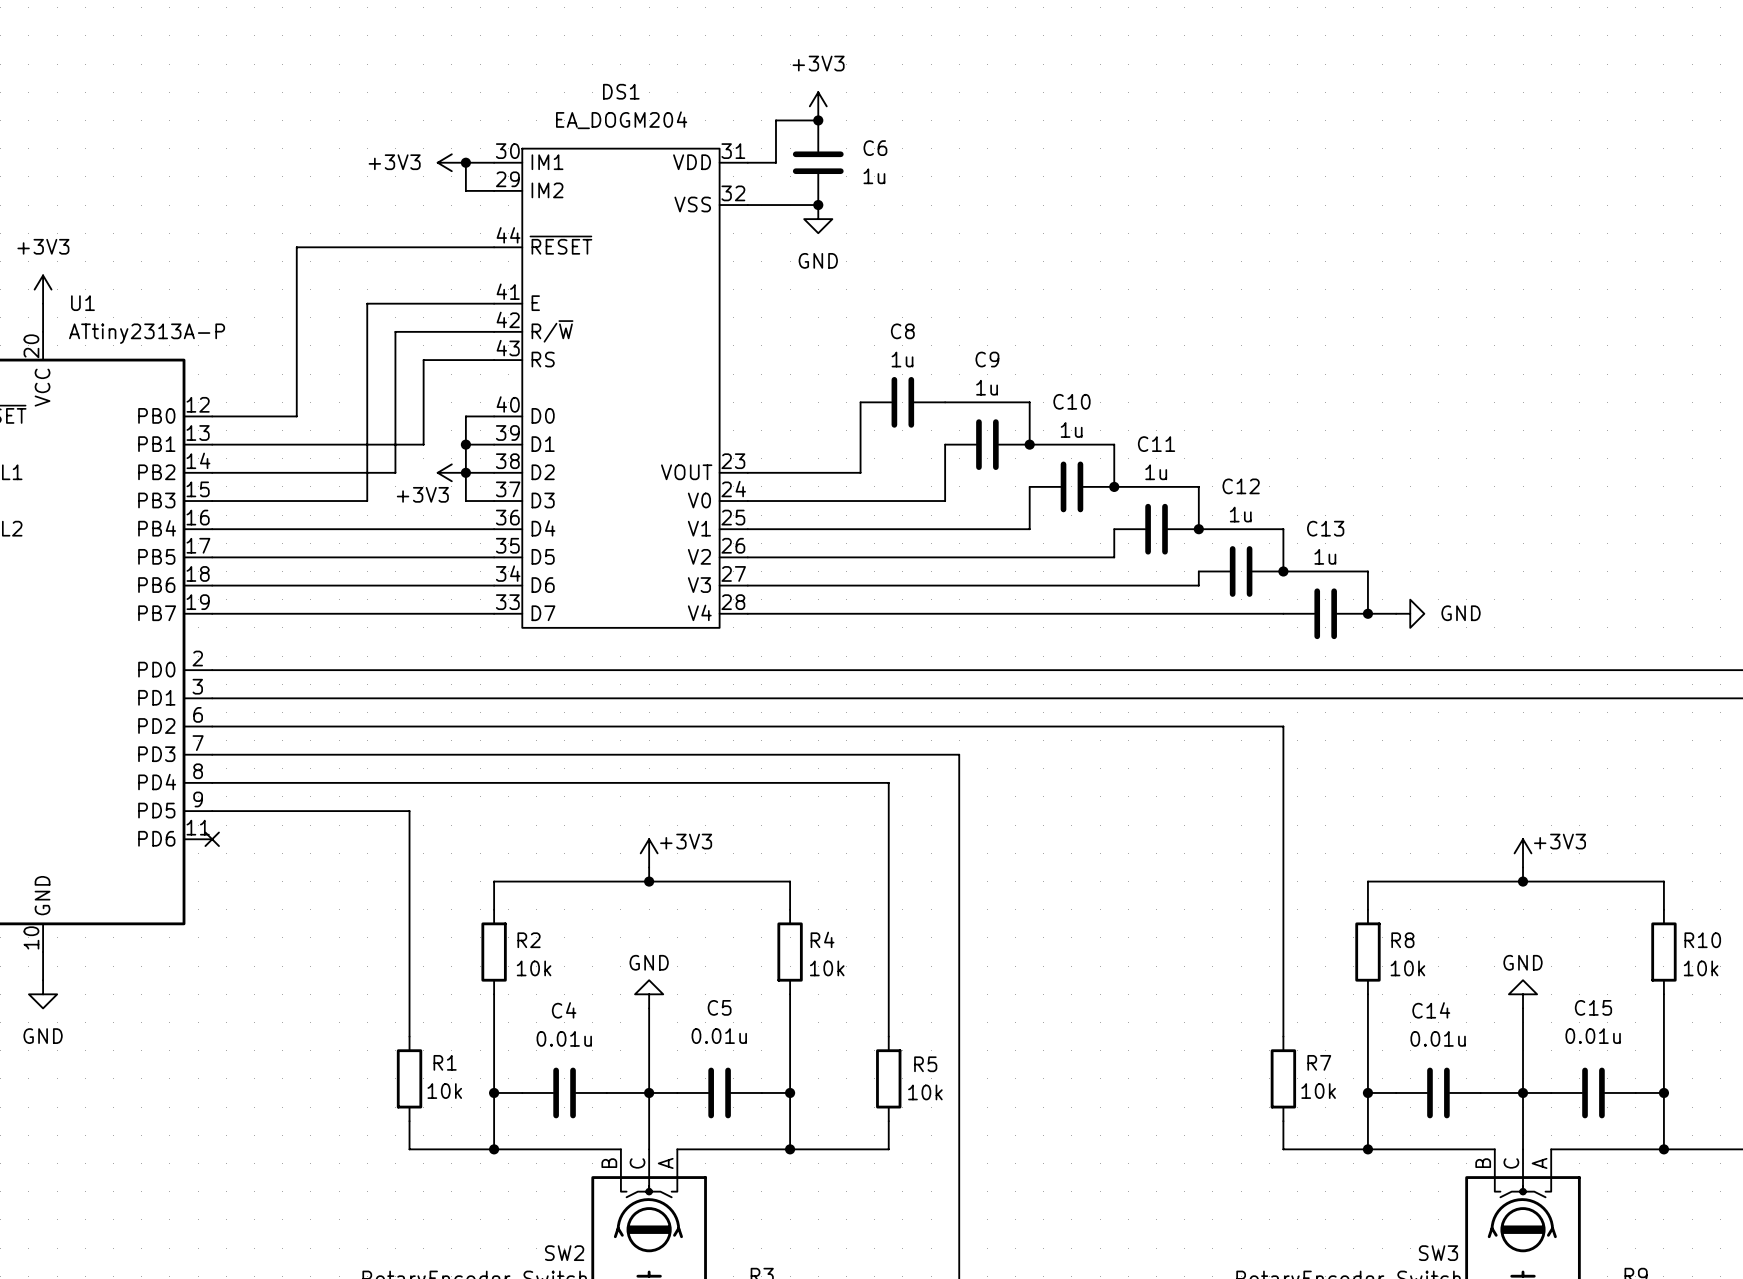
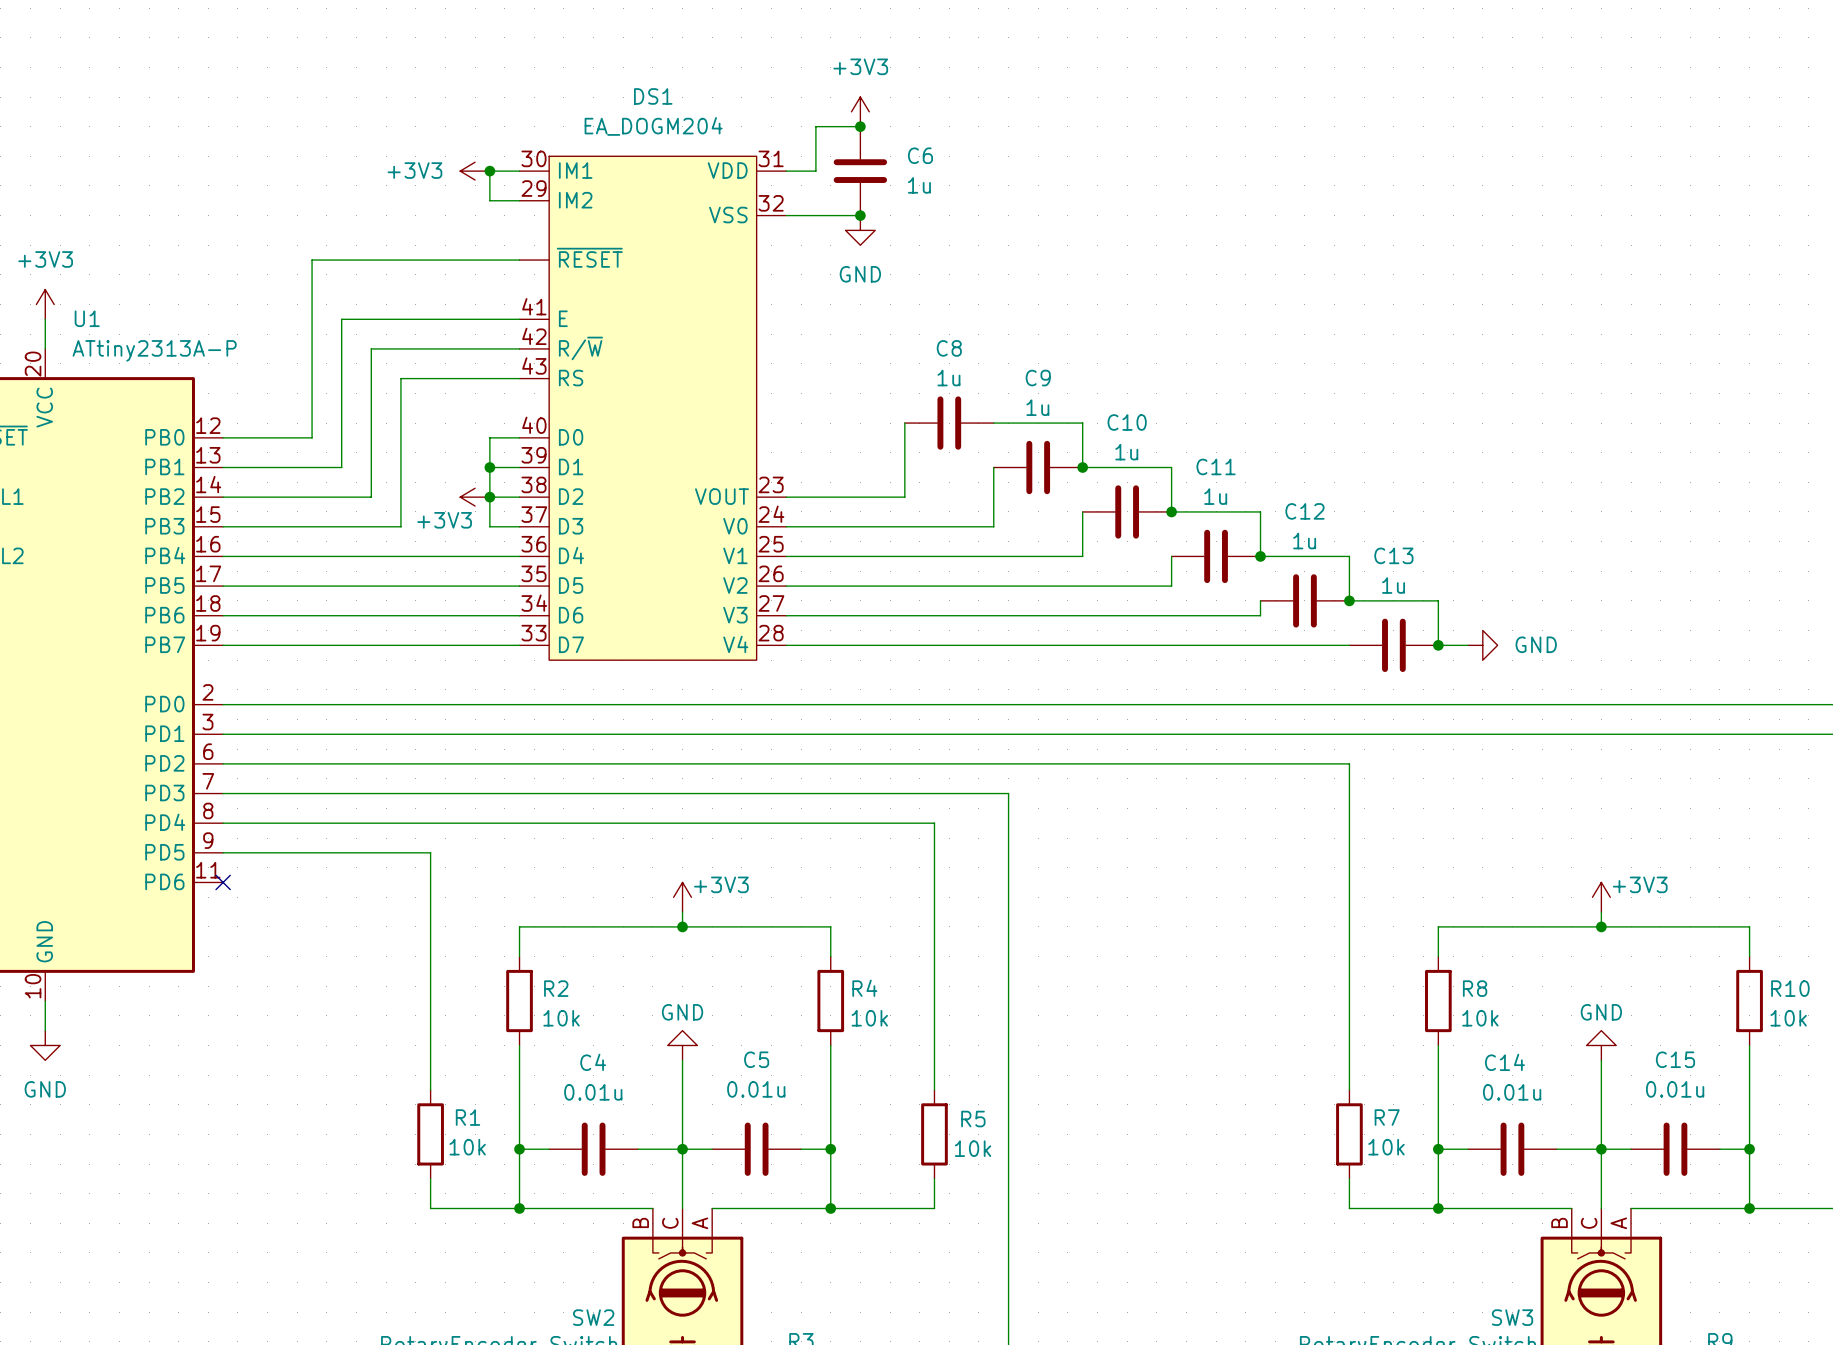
DS1 pin number: 44 (508, 235) -> none
wire: (367, 303) (367, 501) -> (386, 319) (341, 319) (341, 467)
wire: (395, 331) (395, 472) (353, 472) -> (415, 348) (371, 348) (371, 497)
wire: (423, 360) (423, 444) (324, 444) -> (445, 378) (400, 378) (400, 526) (386, 526)

